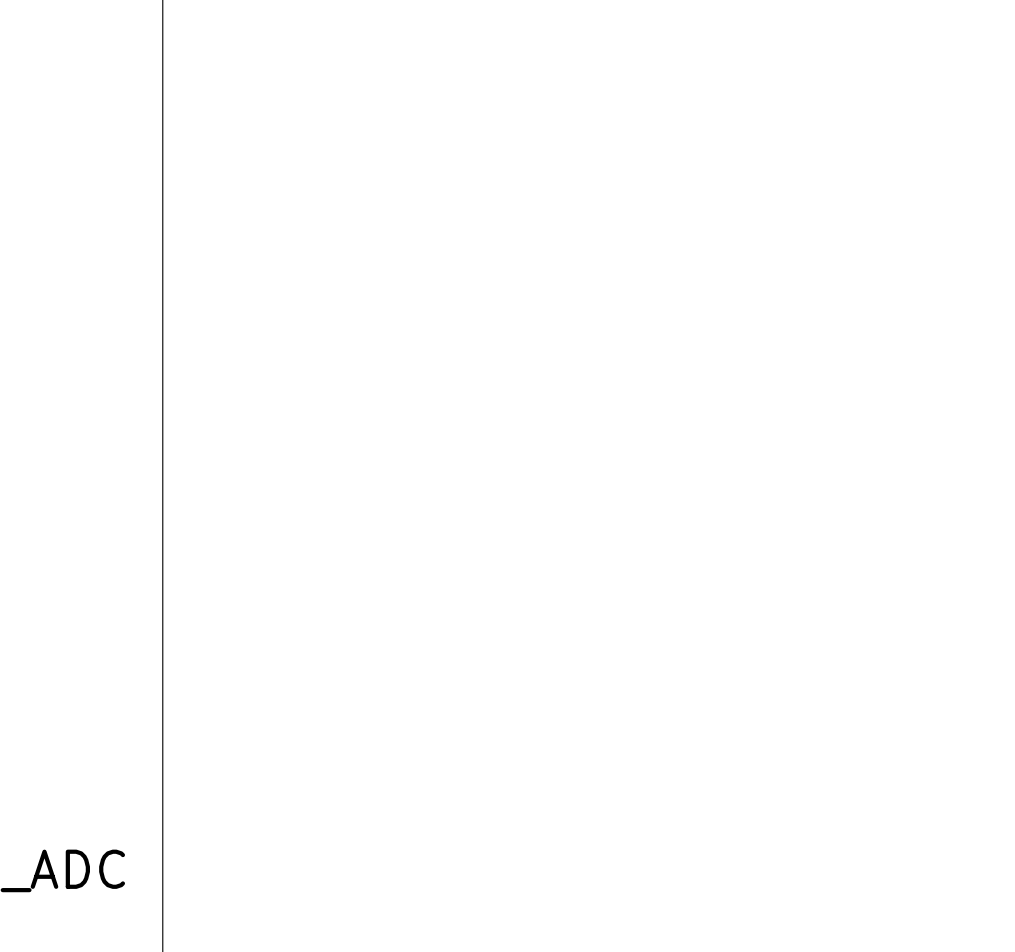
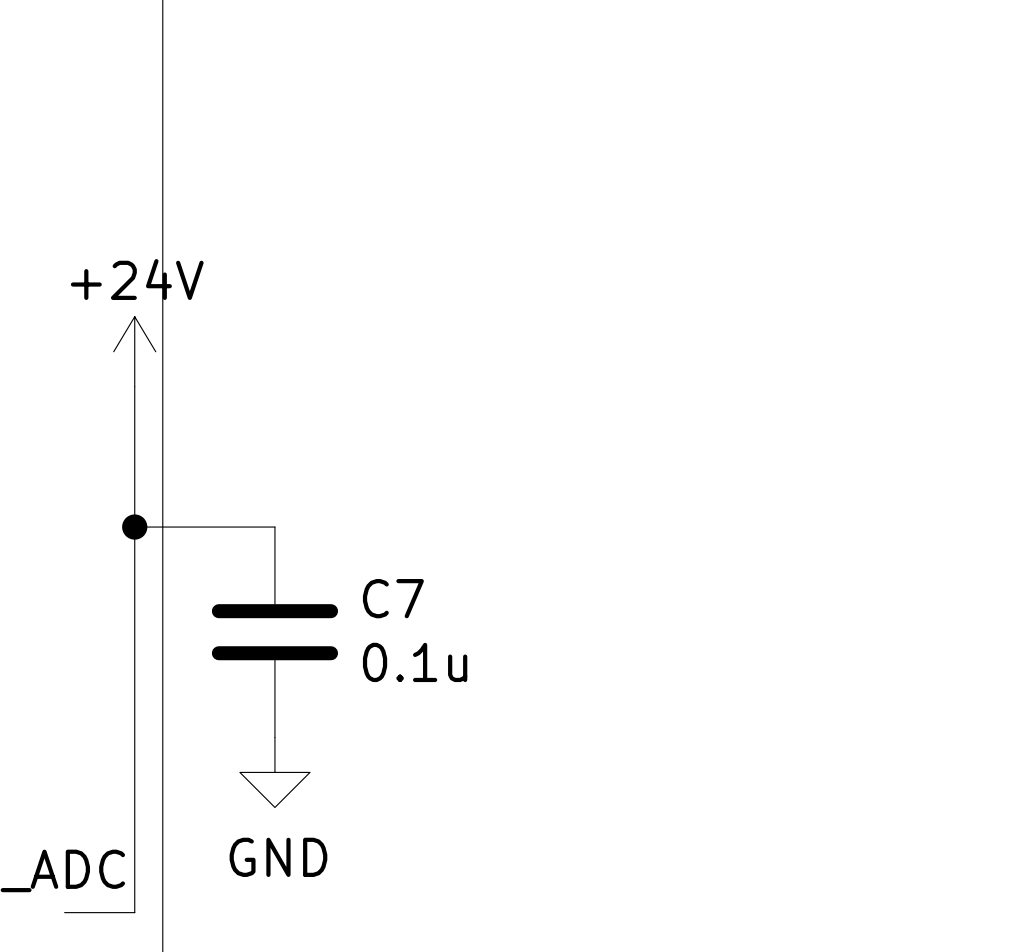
power symbol: none -> +24V (134, 351)
wire: none -> (134, 386) (134, 912) (64, 912)
wire: none -> (134, 527) (274, 527)
junction: none -> (134, 527)
C7: none -> 0.1u (274, 632)
power symbol: none -> GND (274, 772)

